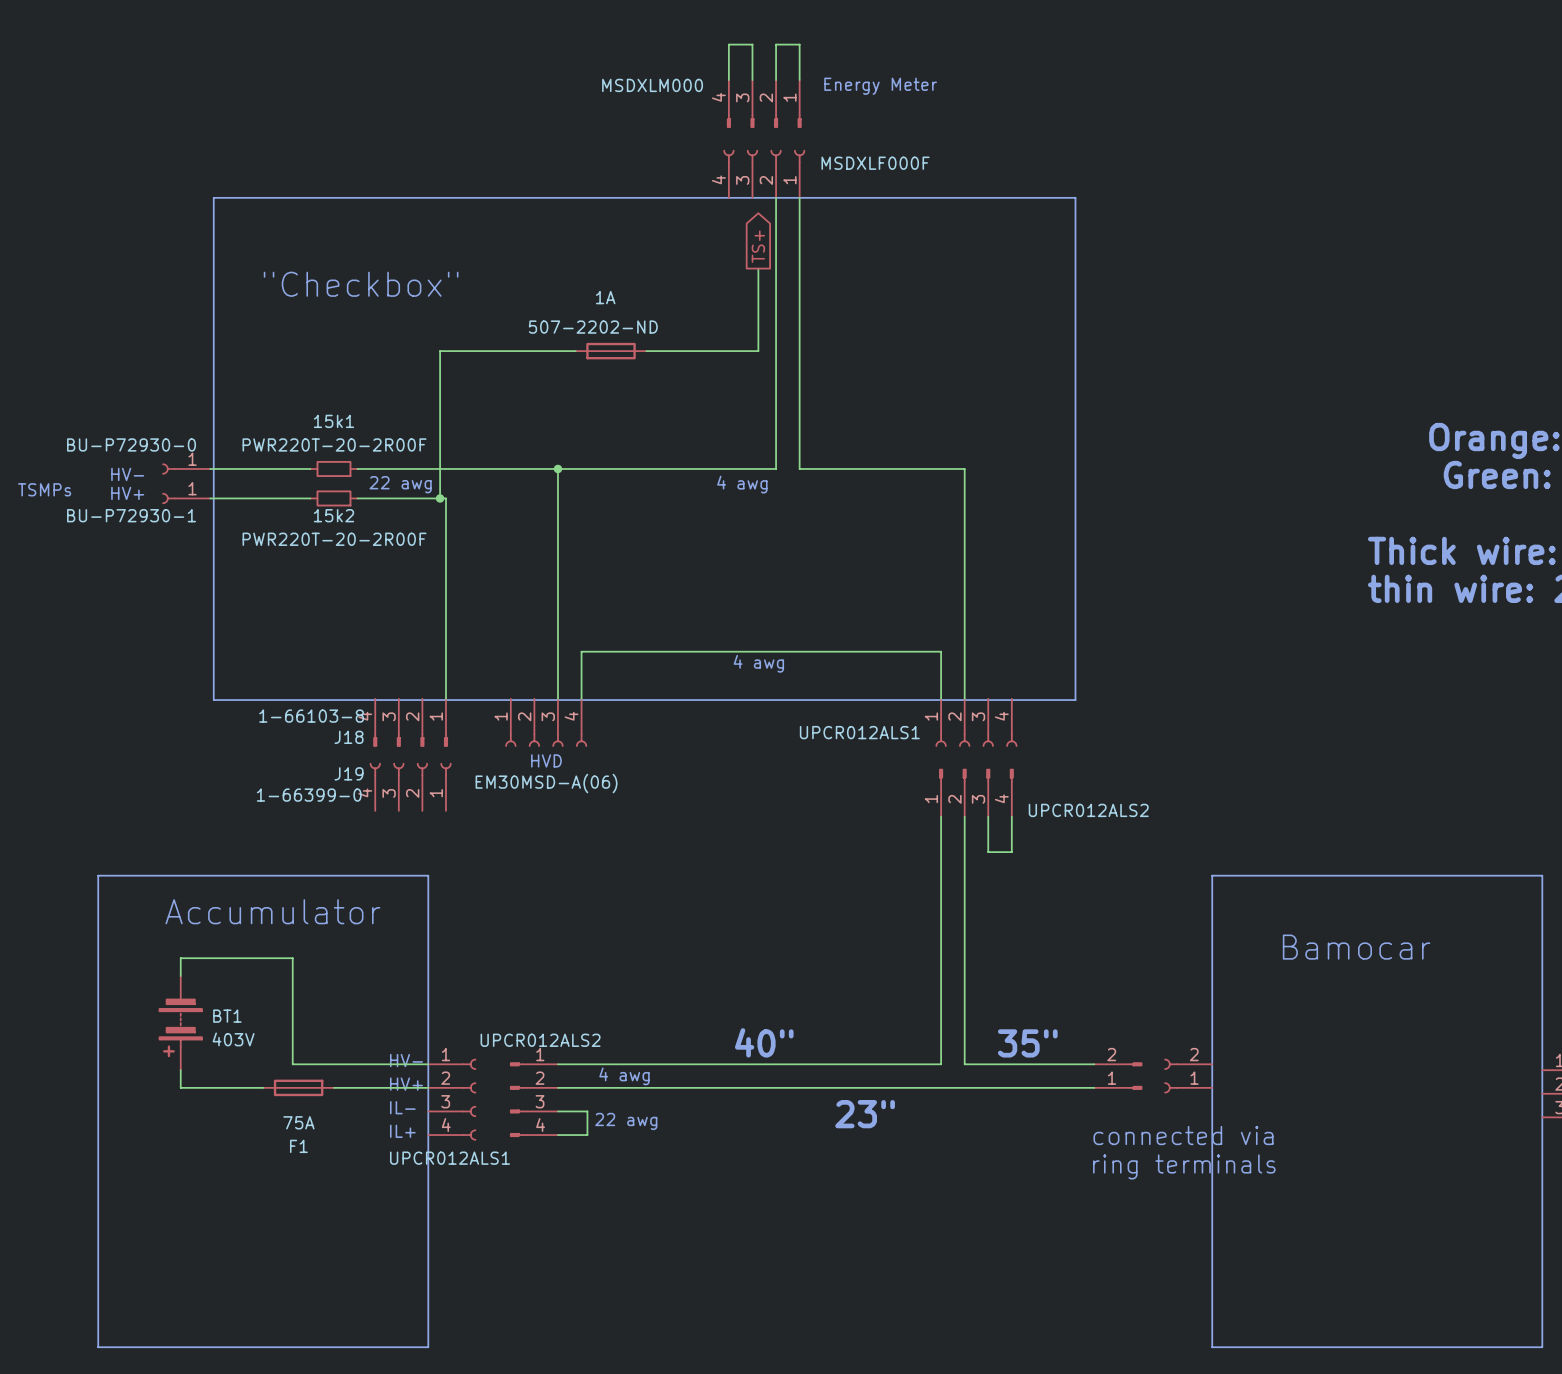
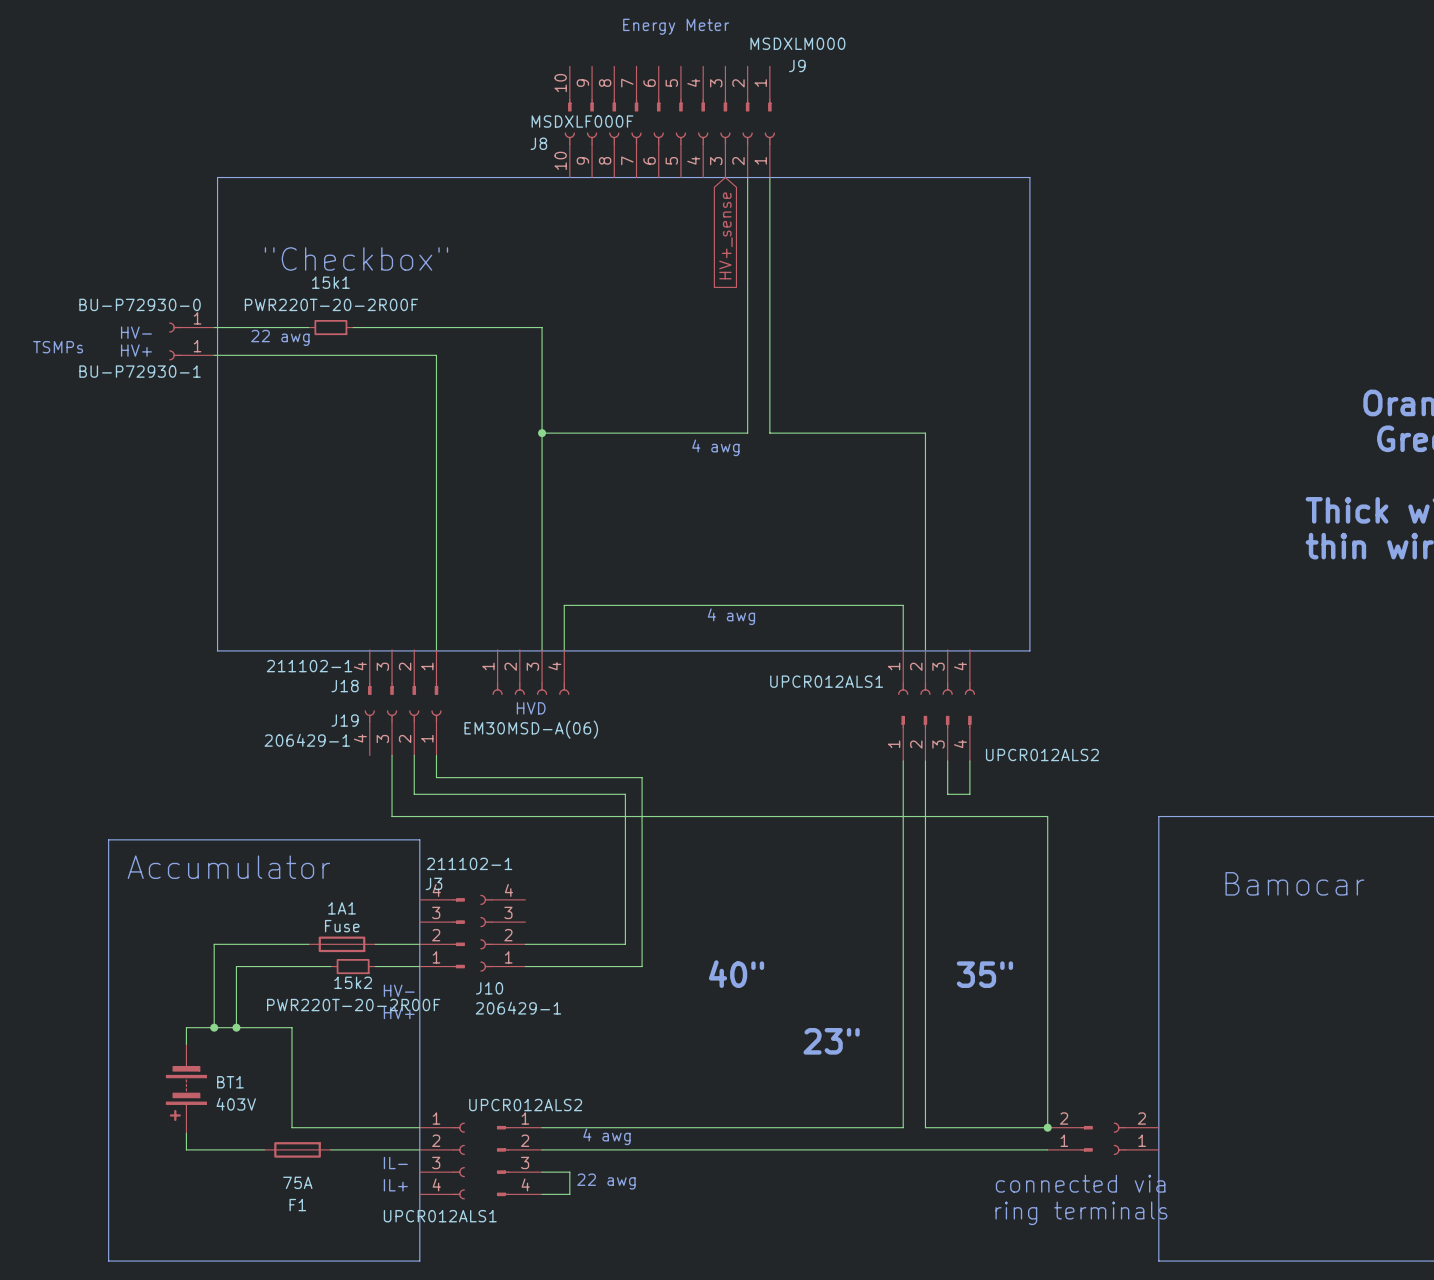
wire: (728, 79) (728, 44) (752, 44) (752, 79) -> none
wire: (776, 79) (776, 44) (799, 44) (799, 79) -> none
text position: Energy Meter (880, 86) -> Energy Meter (676, 26)
J9: none -> MSDXLM000 (669, 88)
part: MSDXLM000 (764, 103) -> none
J8: none -> MSDXLF000F (669, 154)
part: MSDXLF000F (764, 173) -> none
global label: TS+ (758, 246) -> none
global label: none -> HV+_sense (725, 235)
wire: (758, 268) (758, 351) (646, 351) -> none
wire: (575, 351) (440, 351) (440, 498) -> none
1A: 507-2202-ND (611, 351) -> none
part position: (186, 468) -> (191, 327)
wire: (210, 468) (310, 468) -> (214, 327) (308, 327)
15k1 position: (333, 468) -> (330, 327)
wire: (357, 468) (557, 468) -> (353, 327) (542, 327) (542, 433)
text position: HV- (127, 474) -> HV- (136, 332)
text position: 22 awg (400, 484) -> 22 awg (280, 337)
text position: TSMPs (44, 489) -> TSMPs (58, 347)
text position: HV+ (127, 493) -> HV+ (136, 350)
BU-P72930-1 position: (186, 498) -> (191, 355)
wire: (210, 498) (310, 498) -> none
15k2 position: (333, 498) -> (353, 966)
wire: (357, 498) (445, 498) -> (214, 355) (436, 355) (436, 460)
junction: (440, 498) -> none
J18 value: 1-66103-8 (311, 716) -> 211102-1 (309, 666)
J19 value: 1-66399-0 (309, 795) -> 206429-1 (307, 740)
wire: none -> (414, 755) (414, 794) (625, 794) (625, 944) (525, 944)
wire: none -> (436, 755) (436, 777) (642, 777) (642, 966) (525, 966)
line: (98, 900) (98, 875) (428, 875) (428, 900) -> (108, 839) (419, 839)
text position: Accumulator (272, 911) -> Accumulator (228, 867)
wire: (180, 975) (180, 958) (292, 958) (292, 1064) (428, 1064) -> (186, 1044) (186, 1027) (292, 1027) (292, 1127) (419, 1127)
J3: none -> 211102-1 (442, 933)
J10: none -> 206429-1 (502, 933)
wire: none -> (308, 944) (214, 944) (214, 1027)
1A1: none -> Fuse (342, 944)
wire: none -> (375, 944) (419, 944)
BT1 position: (180, 1023) -> (186, 1088)
wire: none -> (330, 966) (236, 966) (236, 1027)
wire: none -> (375, 966) (419, 966)
wire: (557, 1064) (941, 1064) -> (542, 1127) (903, 1127) (903, 994)
wire: (964, 1064) (1094, 1064) -> (925, 994) (925, 1127) (1047, 1127) (1047, 816) (392, 816) (392, 755)
wire: (180, 1070) (180, 1087) (263, 1087) -> (186, 1133) (186, 1149) (264, 1149)
text position: 4 awg (624, 1076) -> 4 awg (606, 1136)
part position: (1118, 1076) -> (1070, 1138)
part position: (1188, 1076) -> (1136, 1138)
F1 position: (298, 1087) -> (297, 1149)
wire: (333, 1087) (428, 1087) -> (330, 1149) (419, 1149)
wire: (557, 1087) (1094, 1087) -> (542, 1149) (1047, 1149)
junction: none -> (214, 1027)
junction: none -> (236, 1027)
part position: (452, 1099) -> (442, 1161)
part position: (534, 1099) -> (519, 1161)
text position: IL- (402, 1107) -> IL- (395, 1163)
wire: (557, 1111) (587, 1111) (587, 1135) (557, 1135) -> (542, 1172) (569, 1172) (569, 1194) (542, 1194)
text position: 22 awg (626, 1121) -> 22 awg (606, 1181)
text position: IL+ (402, 1131) -> IL+ (395, 1185)
text position: connected via (1183, 1135) -> connected via (1080, 1183)
text position: ring terminals (1184, 1166) -> ring terminals (1081, 1213)
junction: none -> (1047, 1127)

